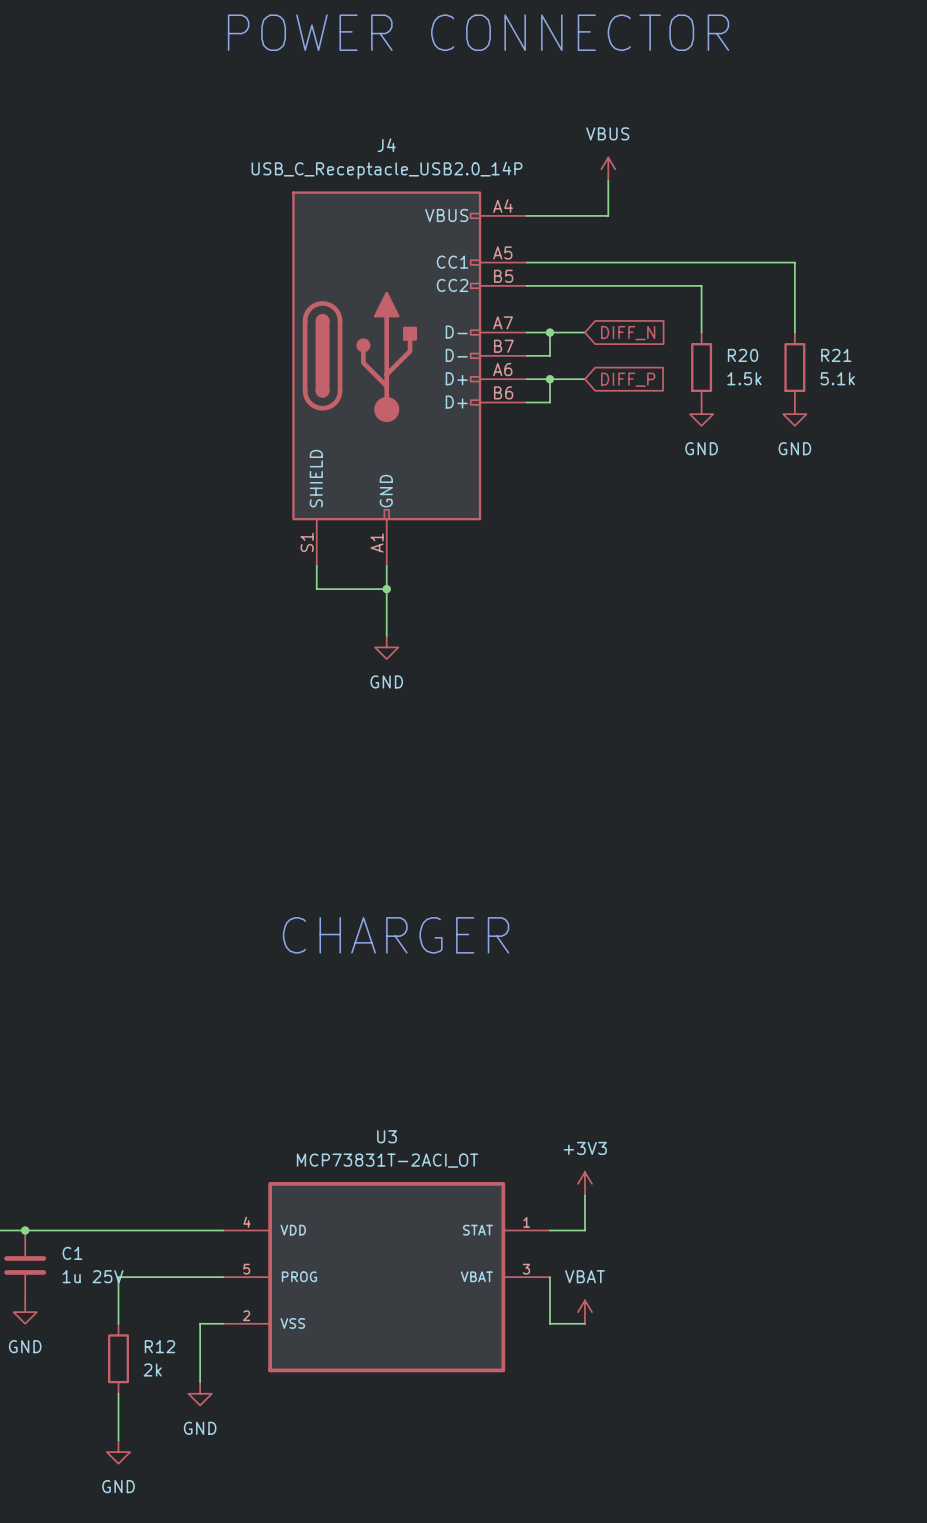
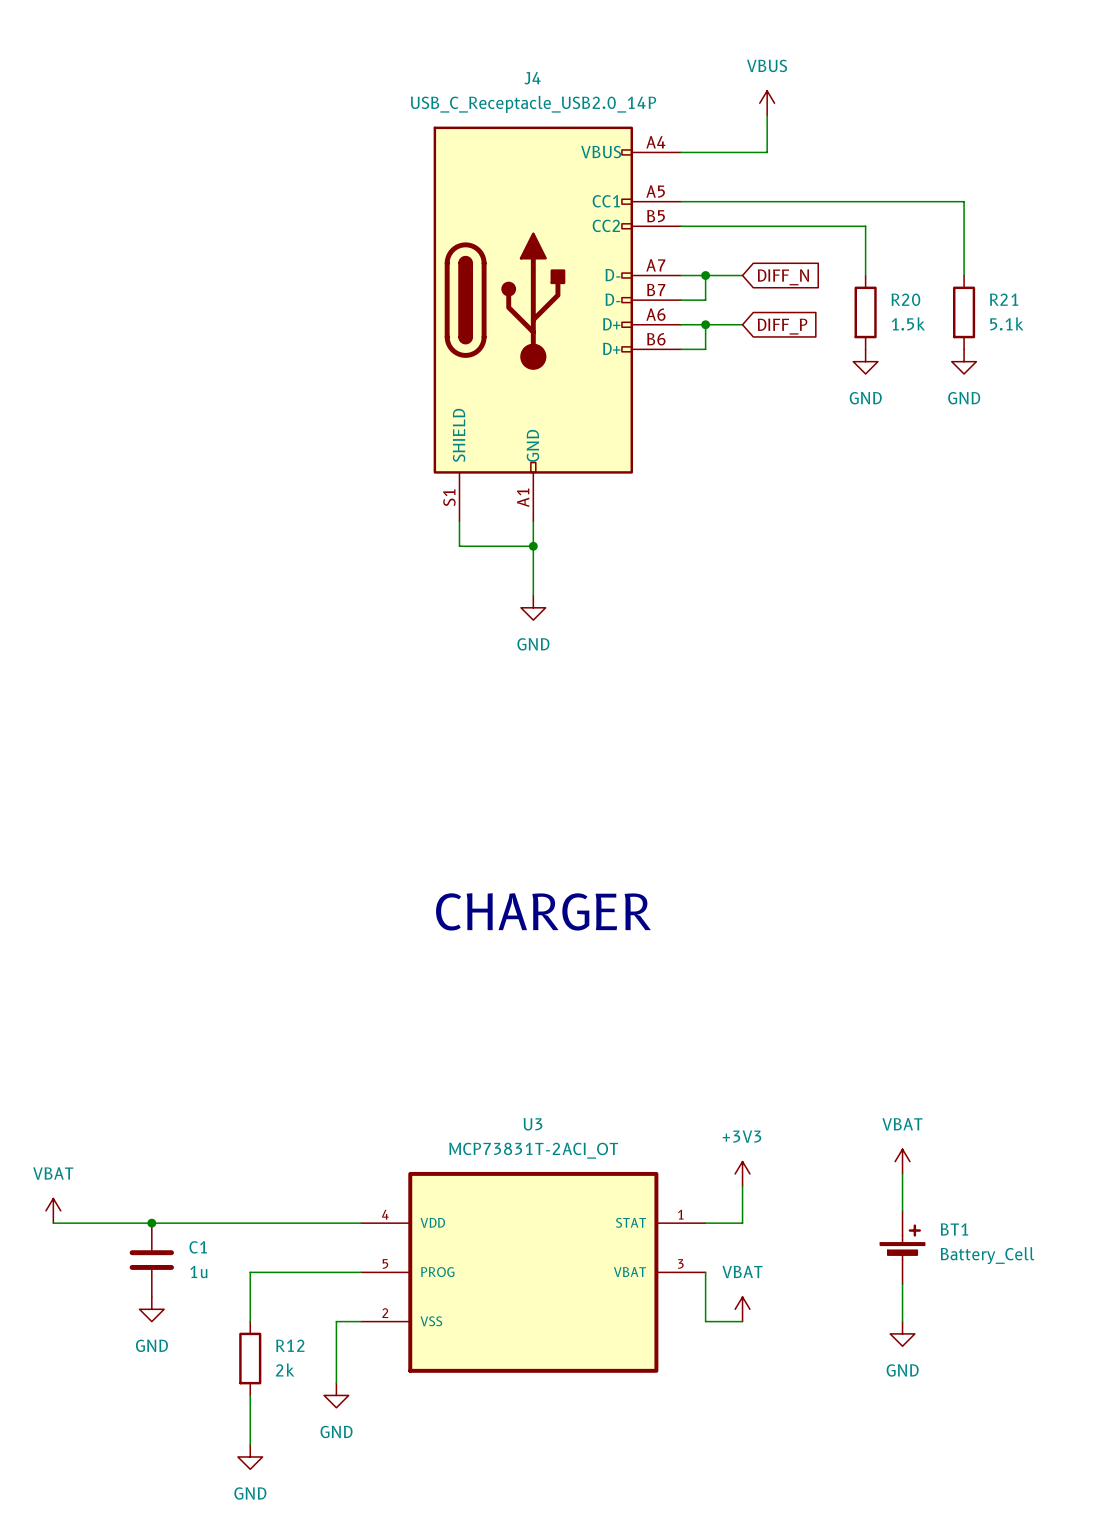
power symbol: none -> VBAT (902, 1161)
wire: none -> (902, 1173) (902, 1210)
BT1: none -> Battery_Cell (902, 1247)
C1 value: 1u 25V (93, 1276) -> 1u (198, 1271)
wire: none -> (902, 1284) (902, 1321)
power symbol: none -> GND (902, 1333)

